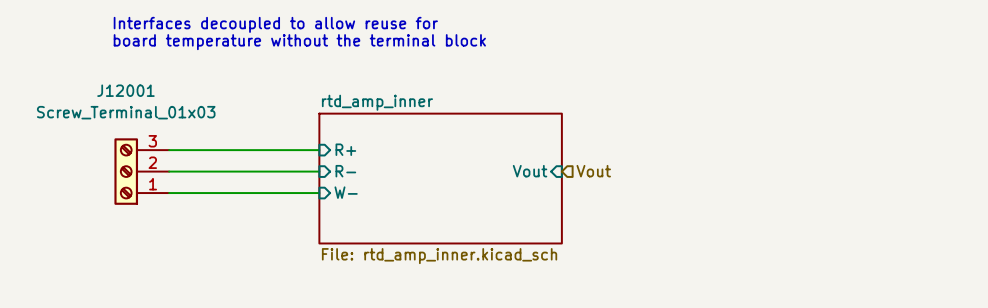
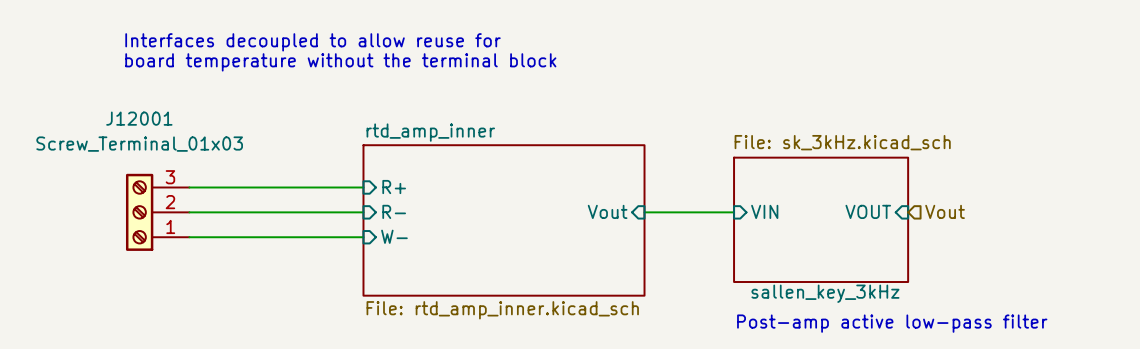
wire: none -> (644, 212) (734, 212)
hierarchical label: Vout (593, 171) -> none
sheet pin: none -> VIN (764, 211)
sheet pin: none -> VOUT (868, 211)
hierarchical label: none -> Vout (945, 211)
sheet sallen_key_3kHz: none -> File: sk_3kHz.kicad_sch (821, 219)
text: none -> Post-amp active low-pass filter (892, 323)

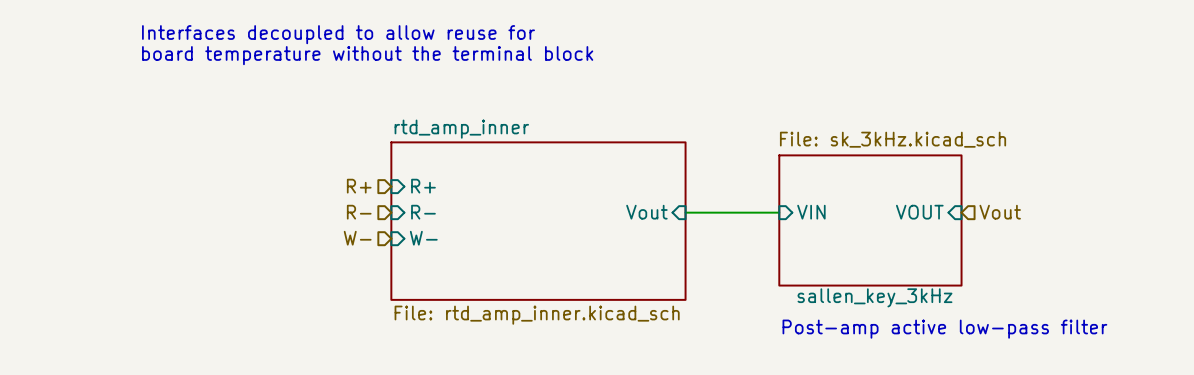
wire: (189, 187) (363, 187) -> none
hierarchical label: none -> R+ (359, 186)
hierarchical label: none -> R- (359, 212)
J12001: Screw_Terminal_01x03 (157, 212) -> none
wire: (189, 212) (363, 212) -> none
hierarchical label: none -> W- (357, 238)
wire: (189, 237) (363, 237) -> none

